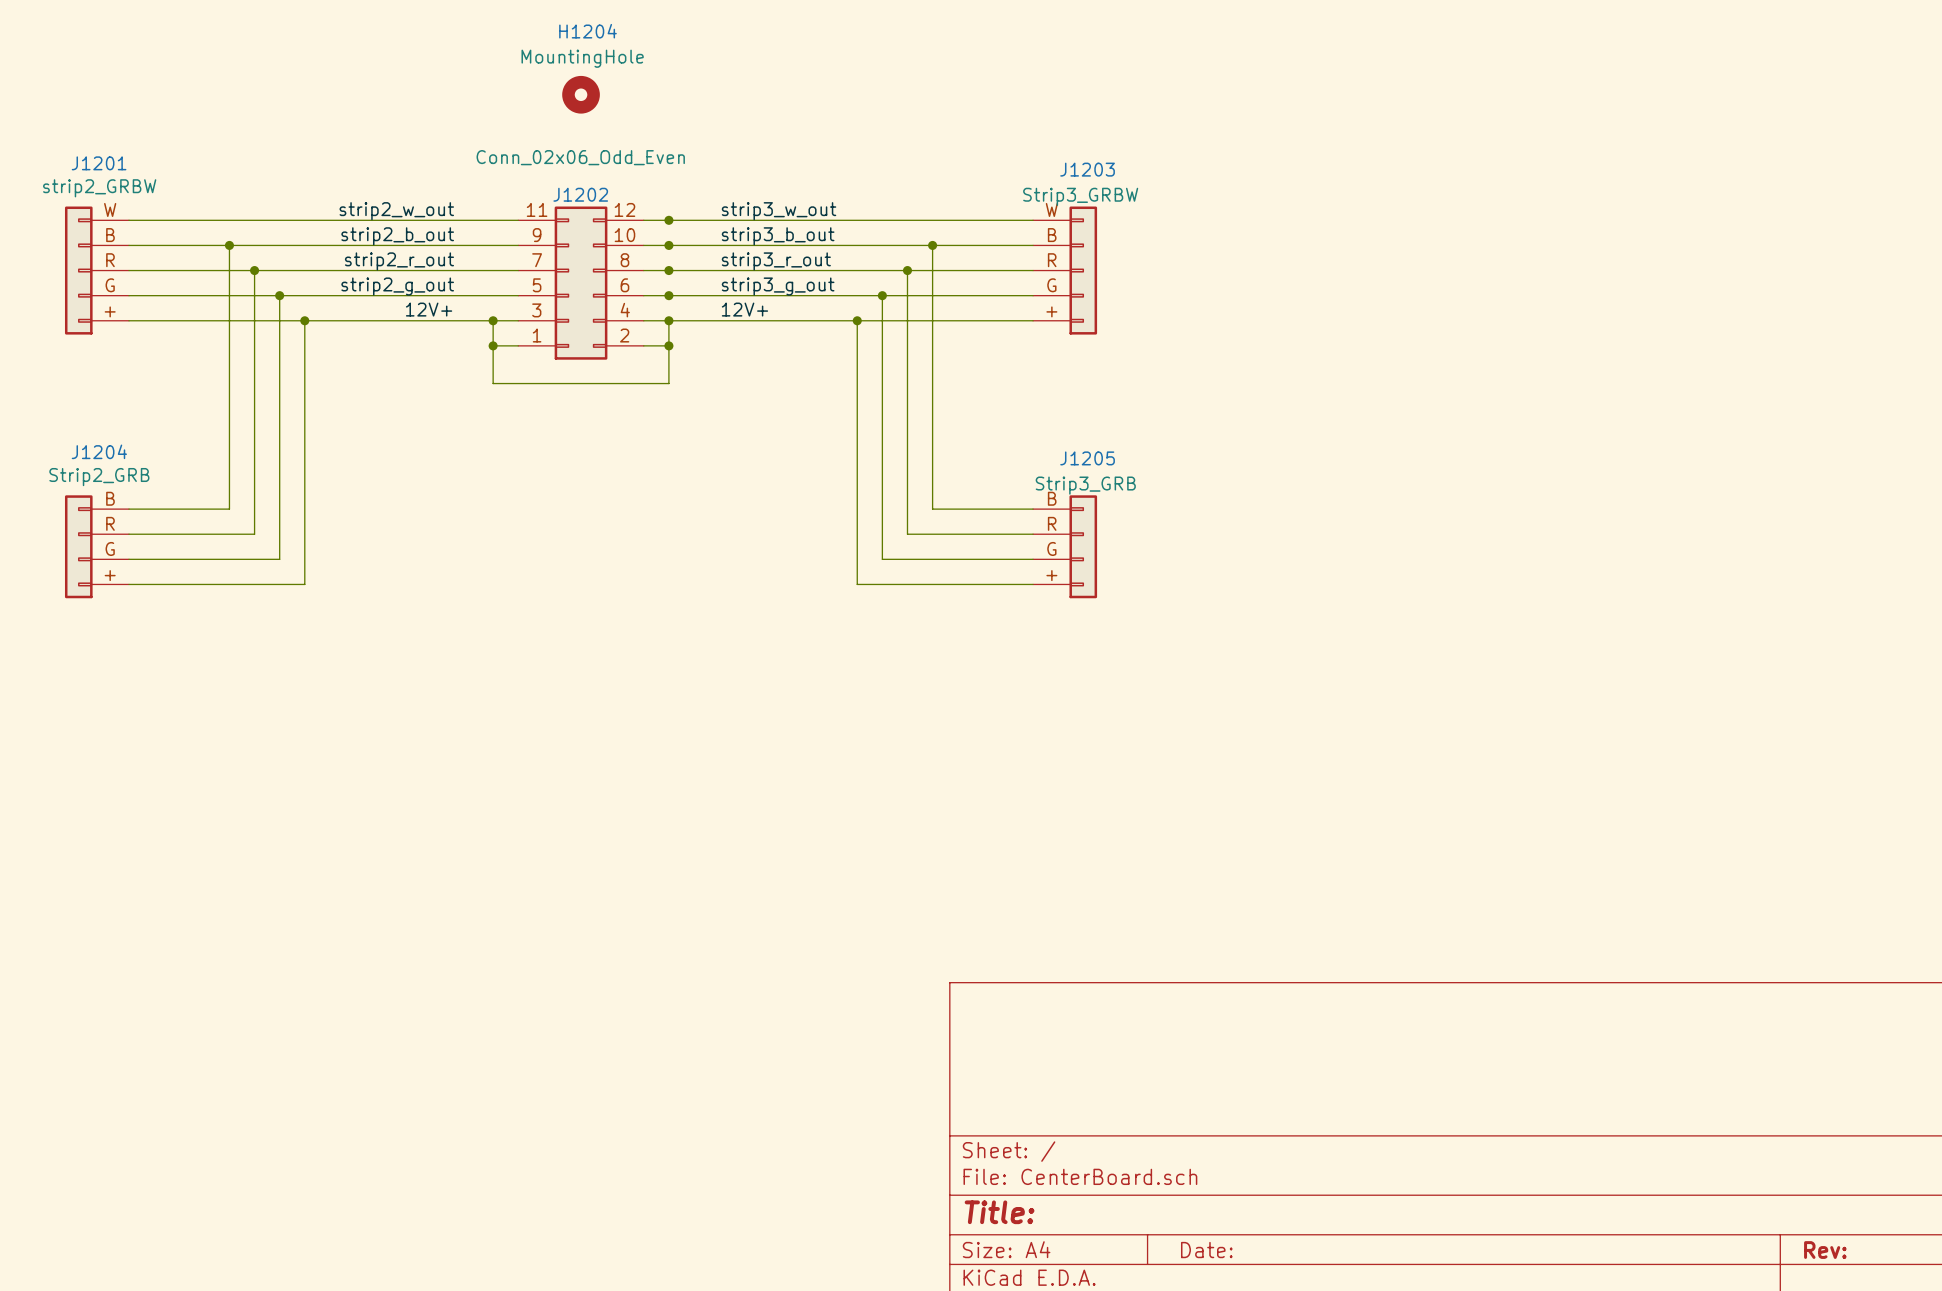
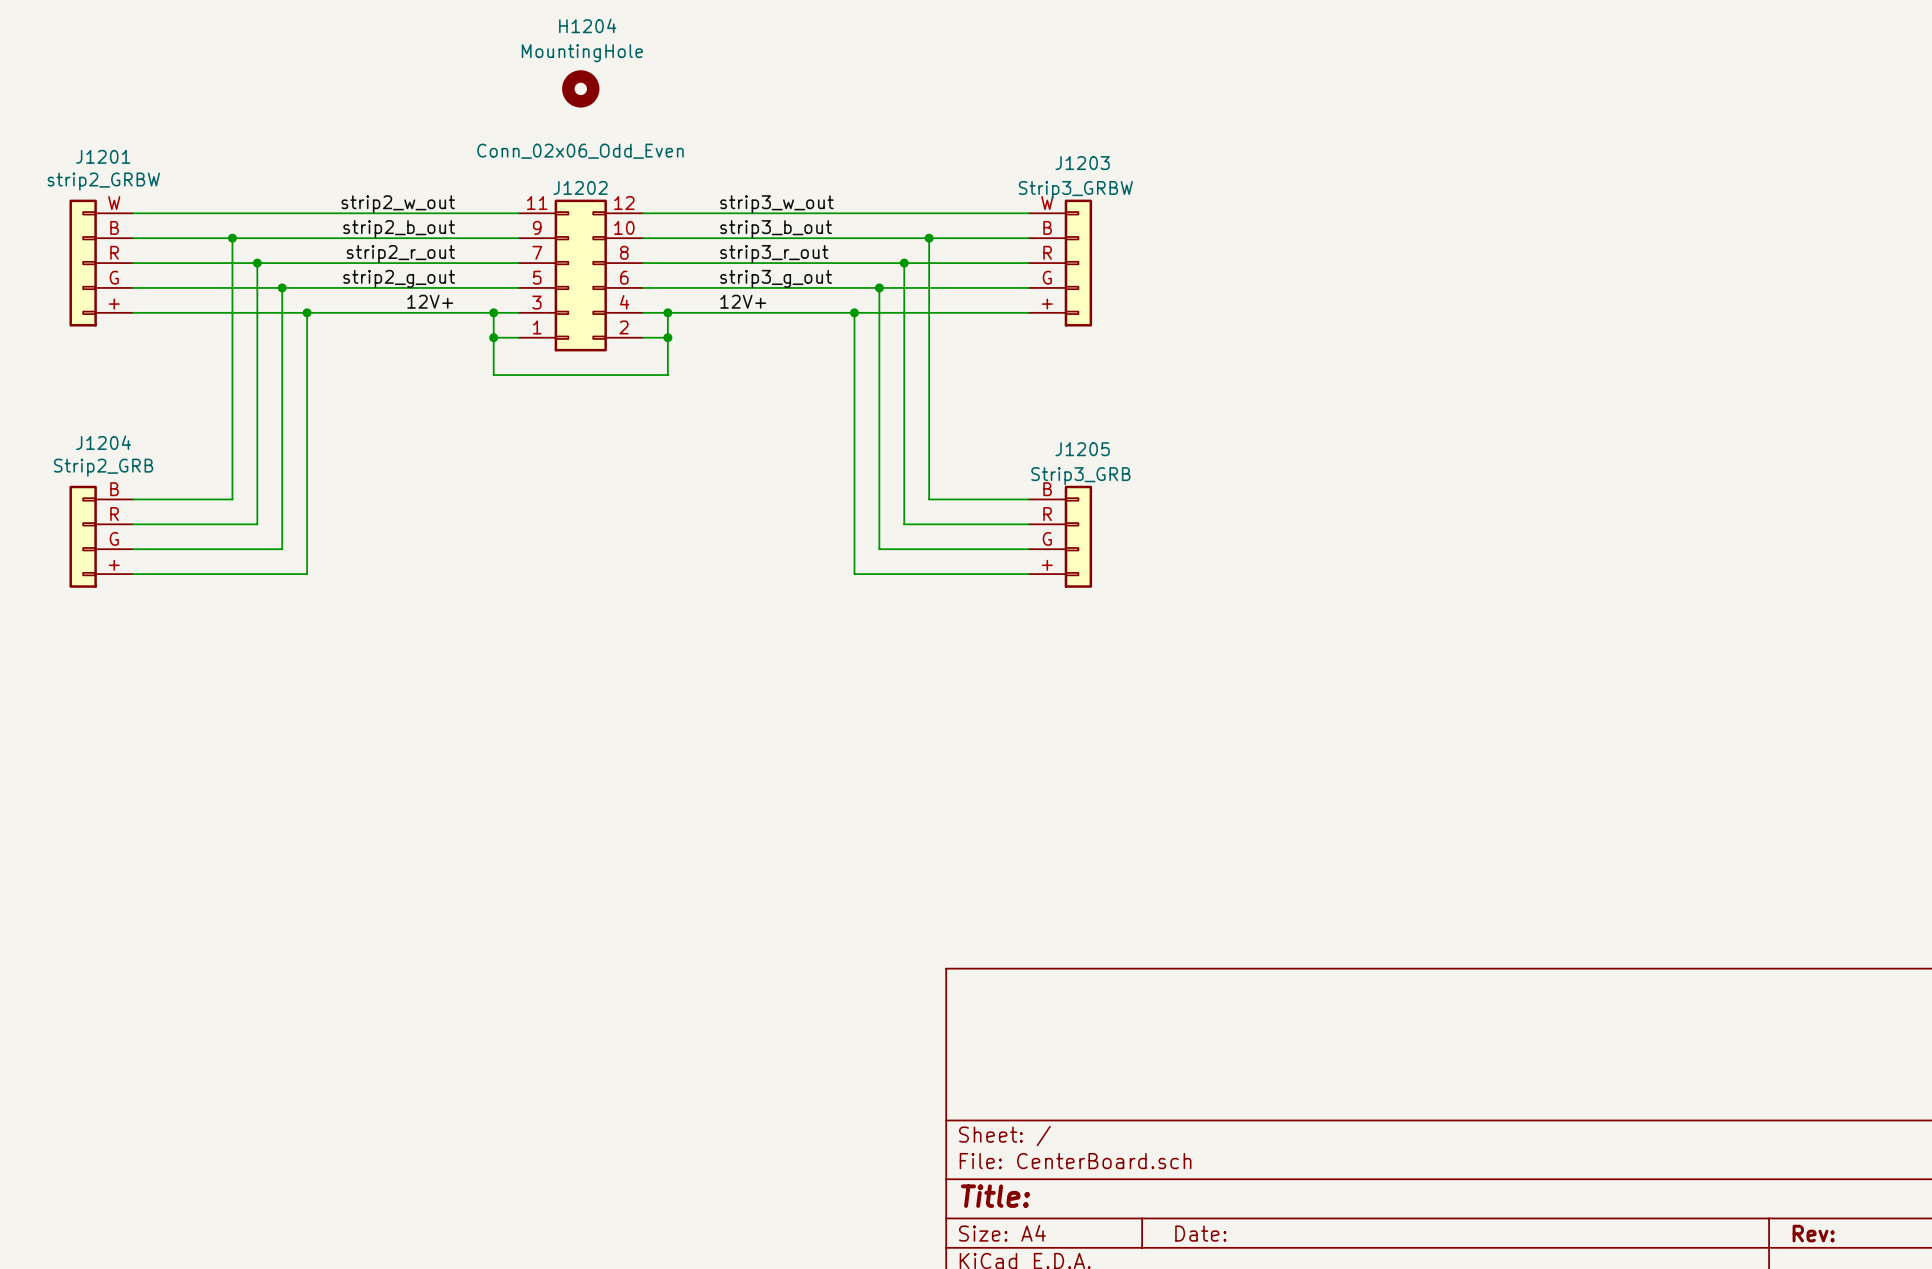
junction: (668, 220) -> none
junction: (668, 245) -> none
junction: (668, 270) -> none
junction: (668, 295) -> none

